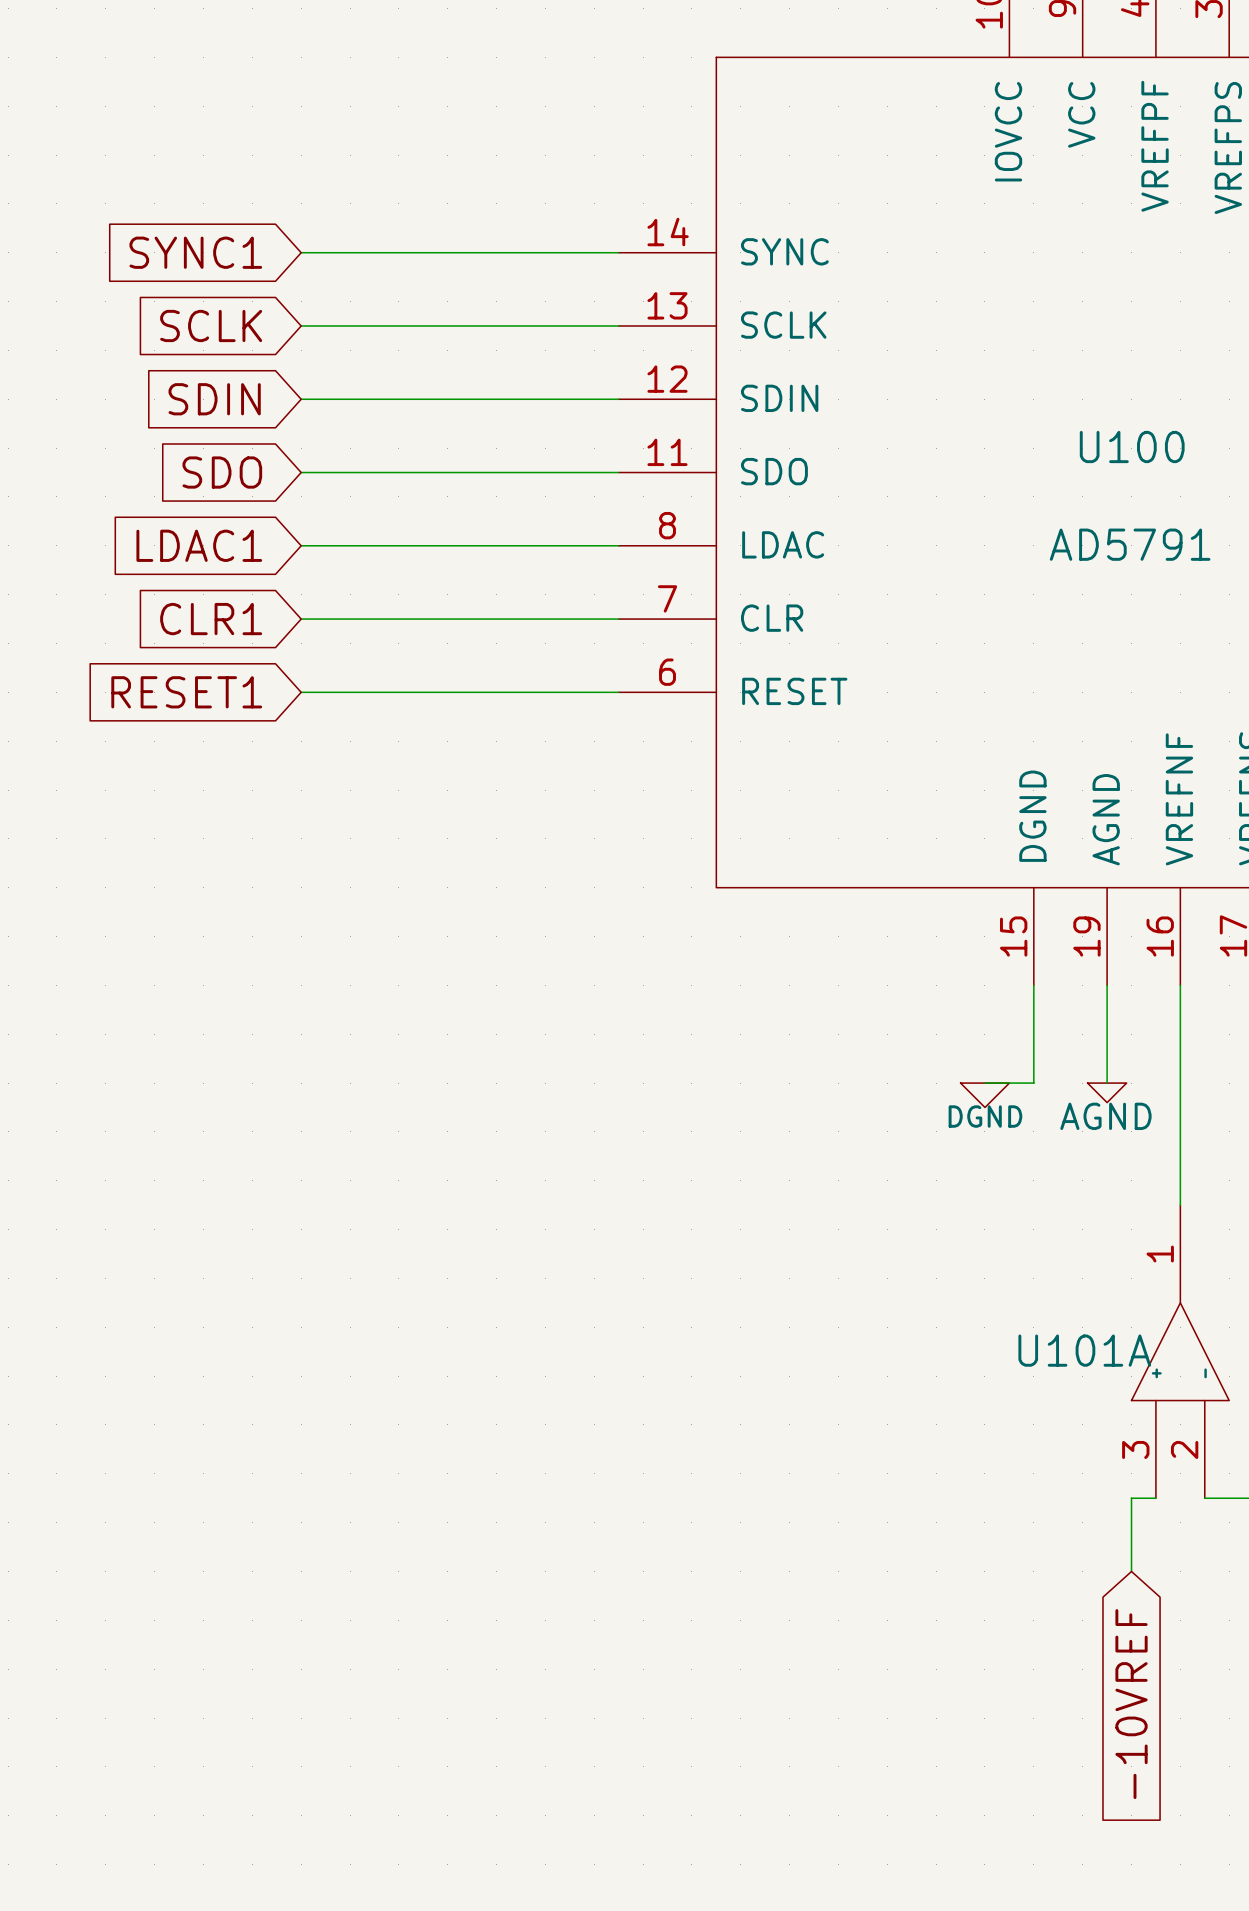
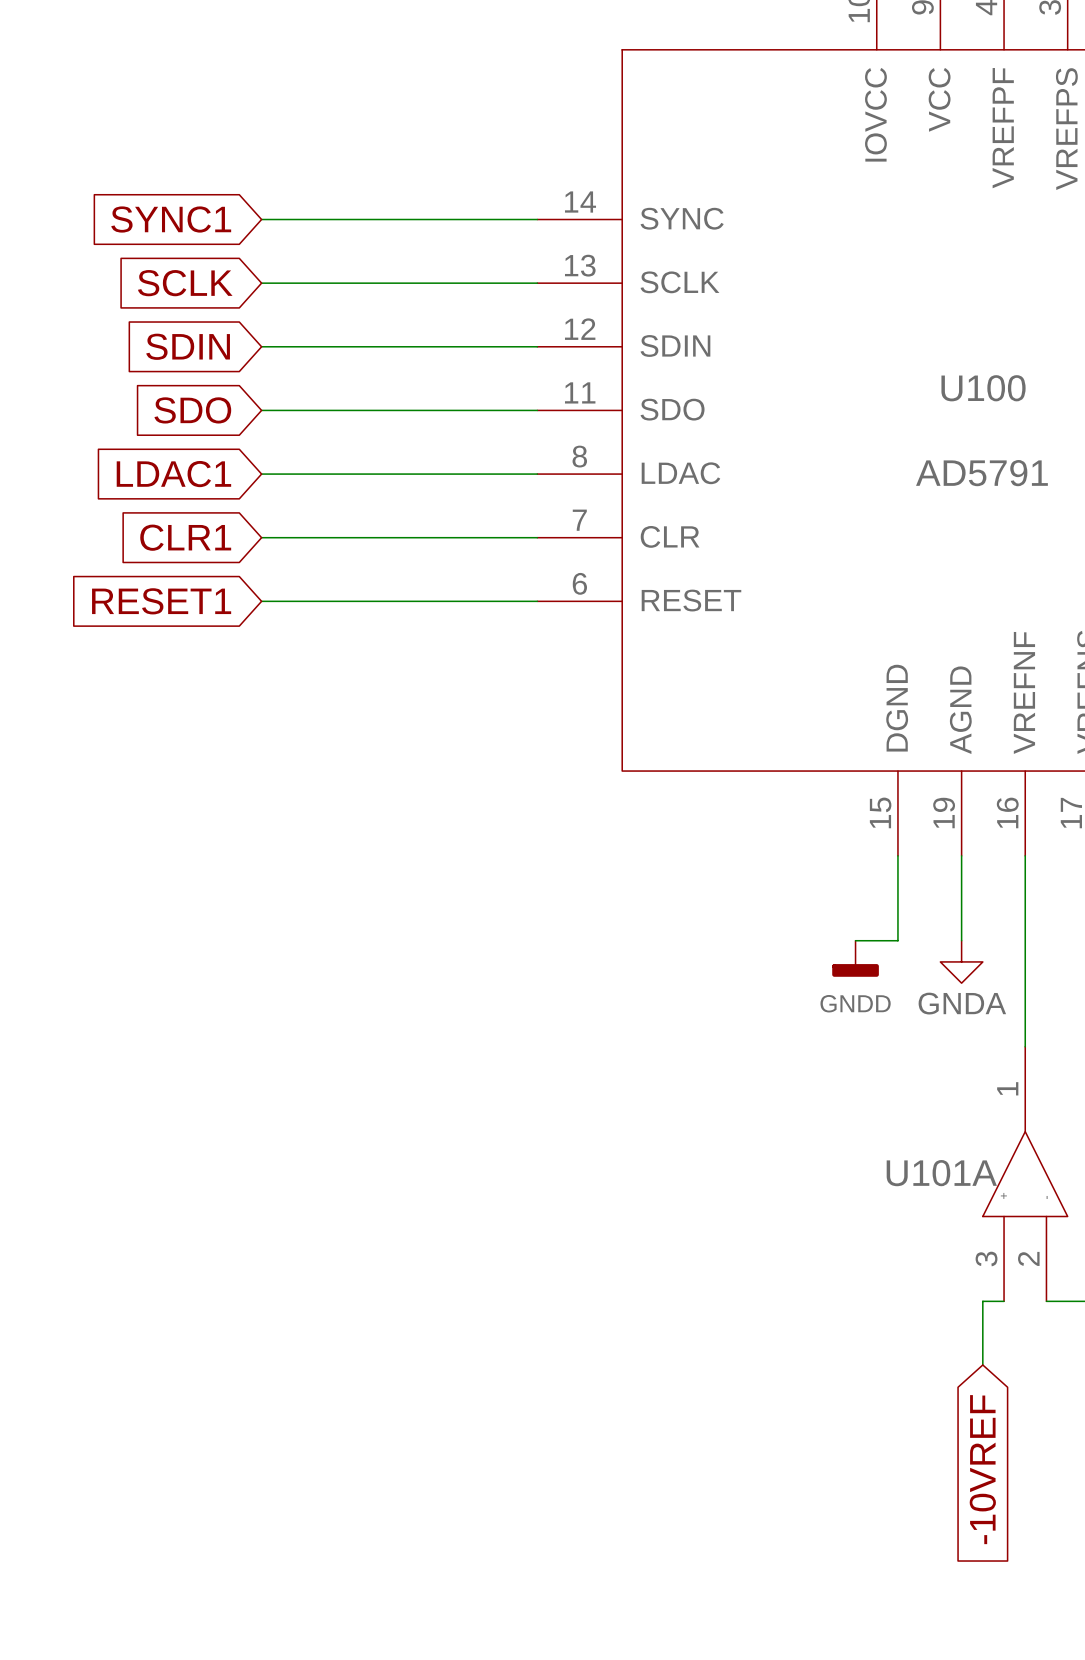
power symbol: AGND (1107, 1092) -> GNDA (961, 961)
power symbol: DGND (984, 1095) -> GNDD (855, 958)

